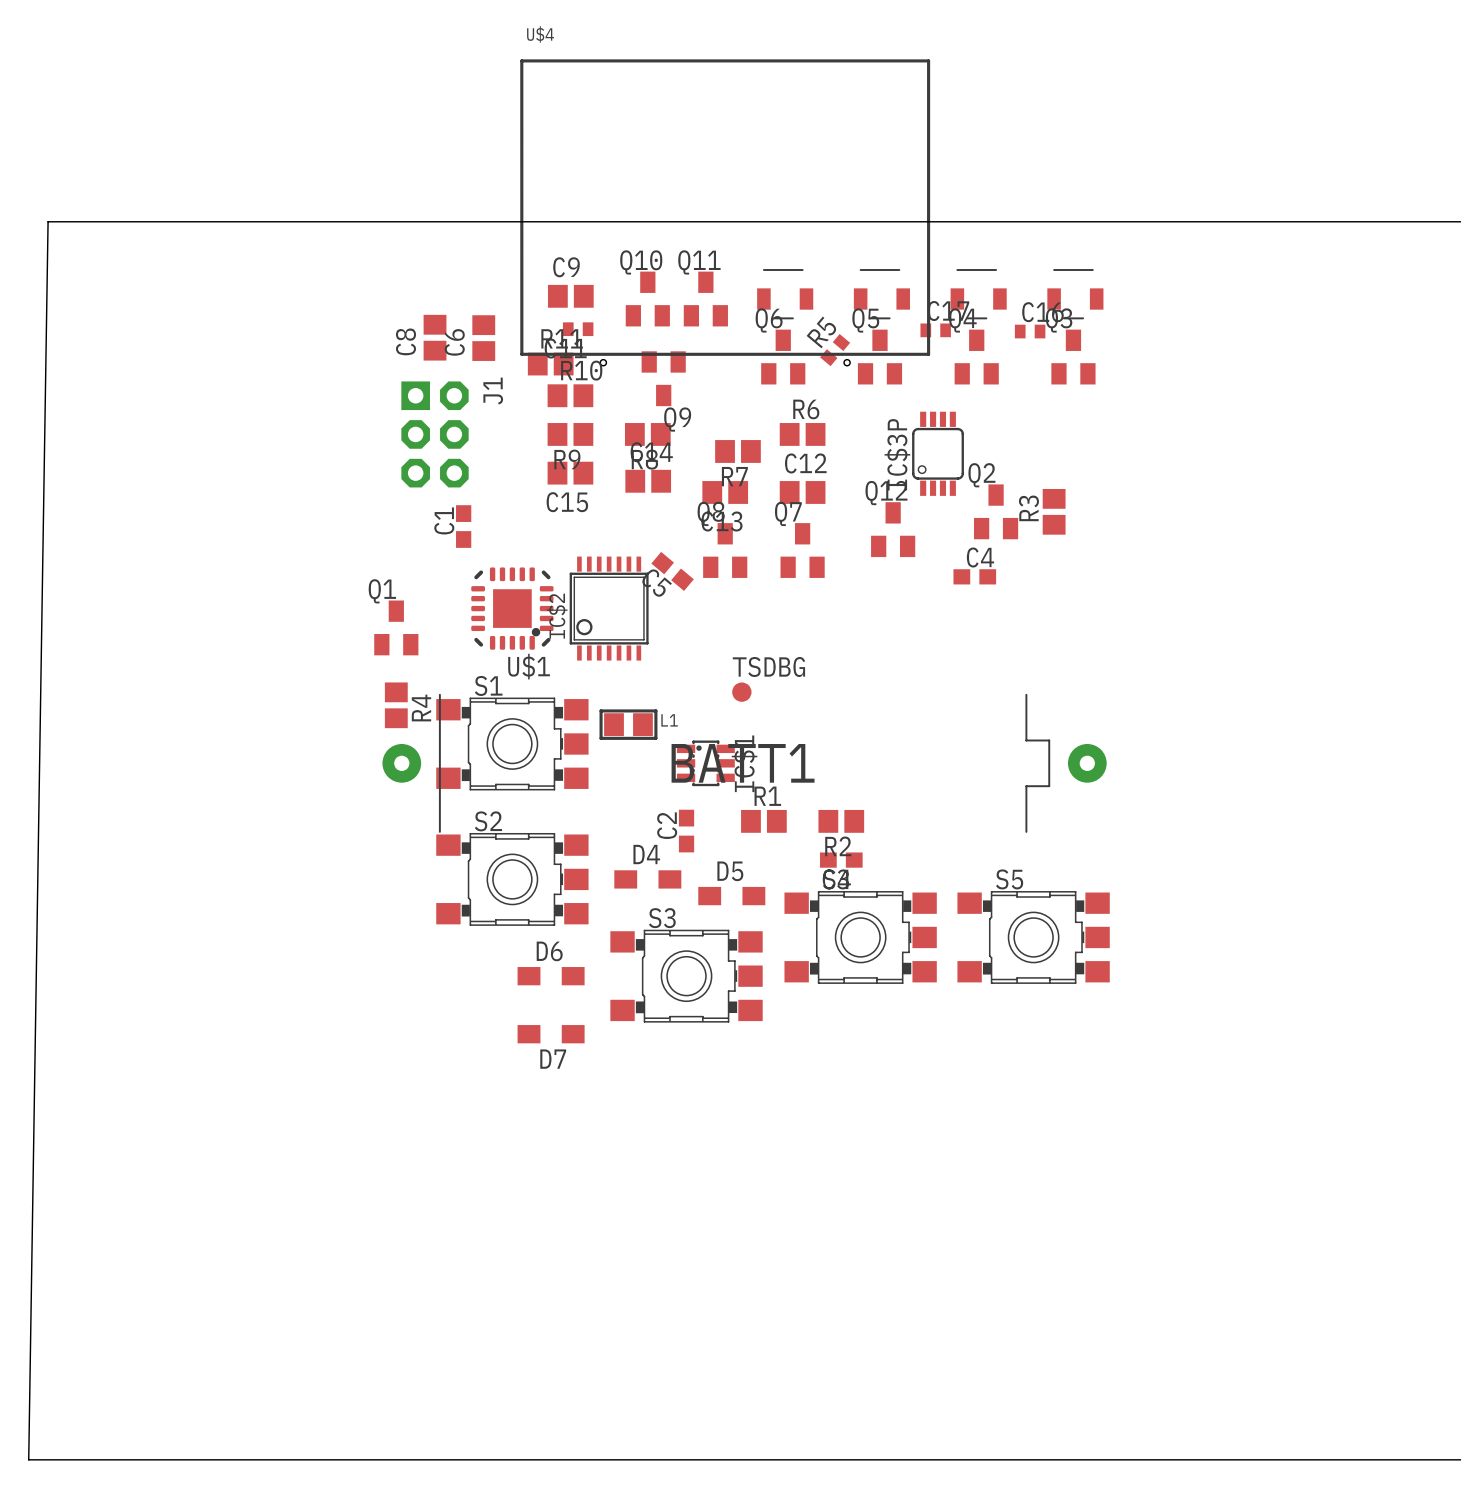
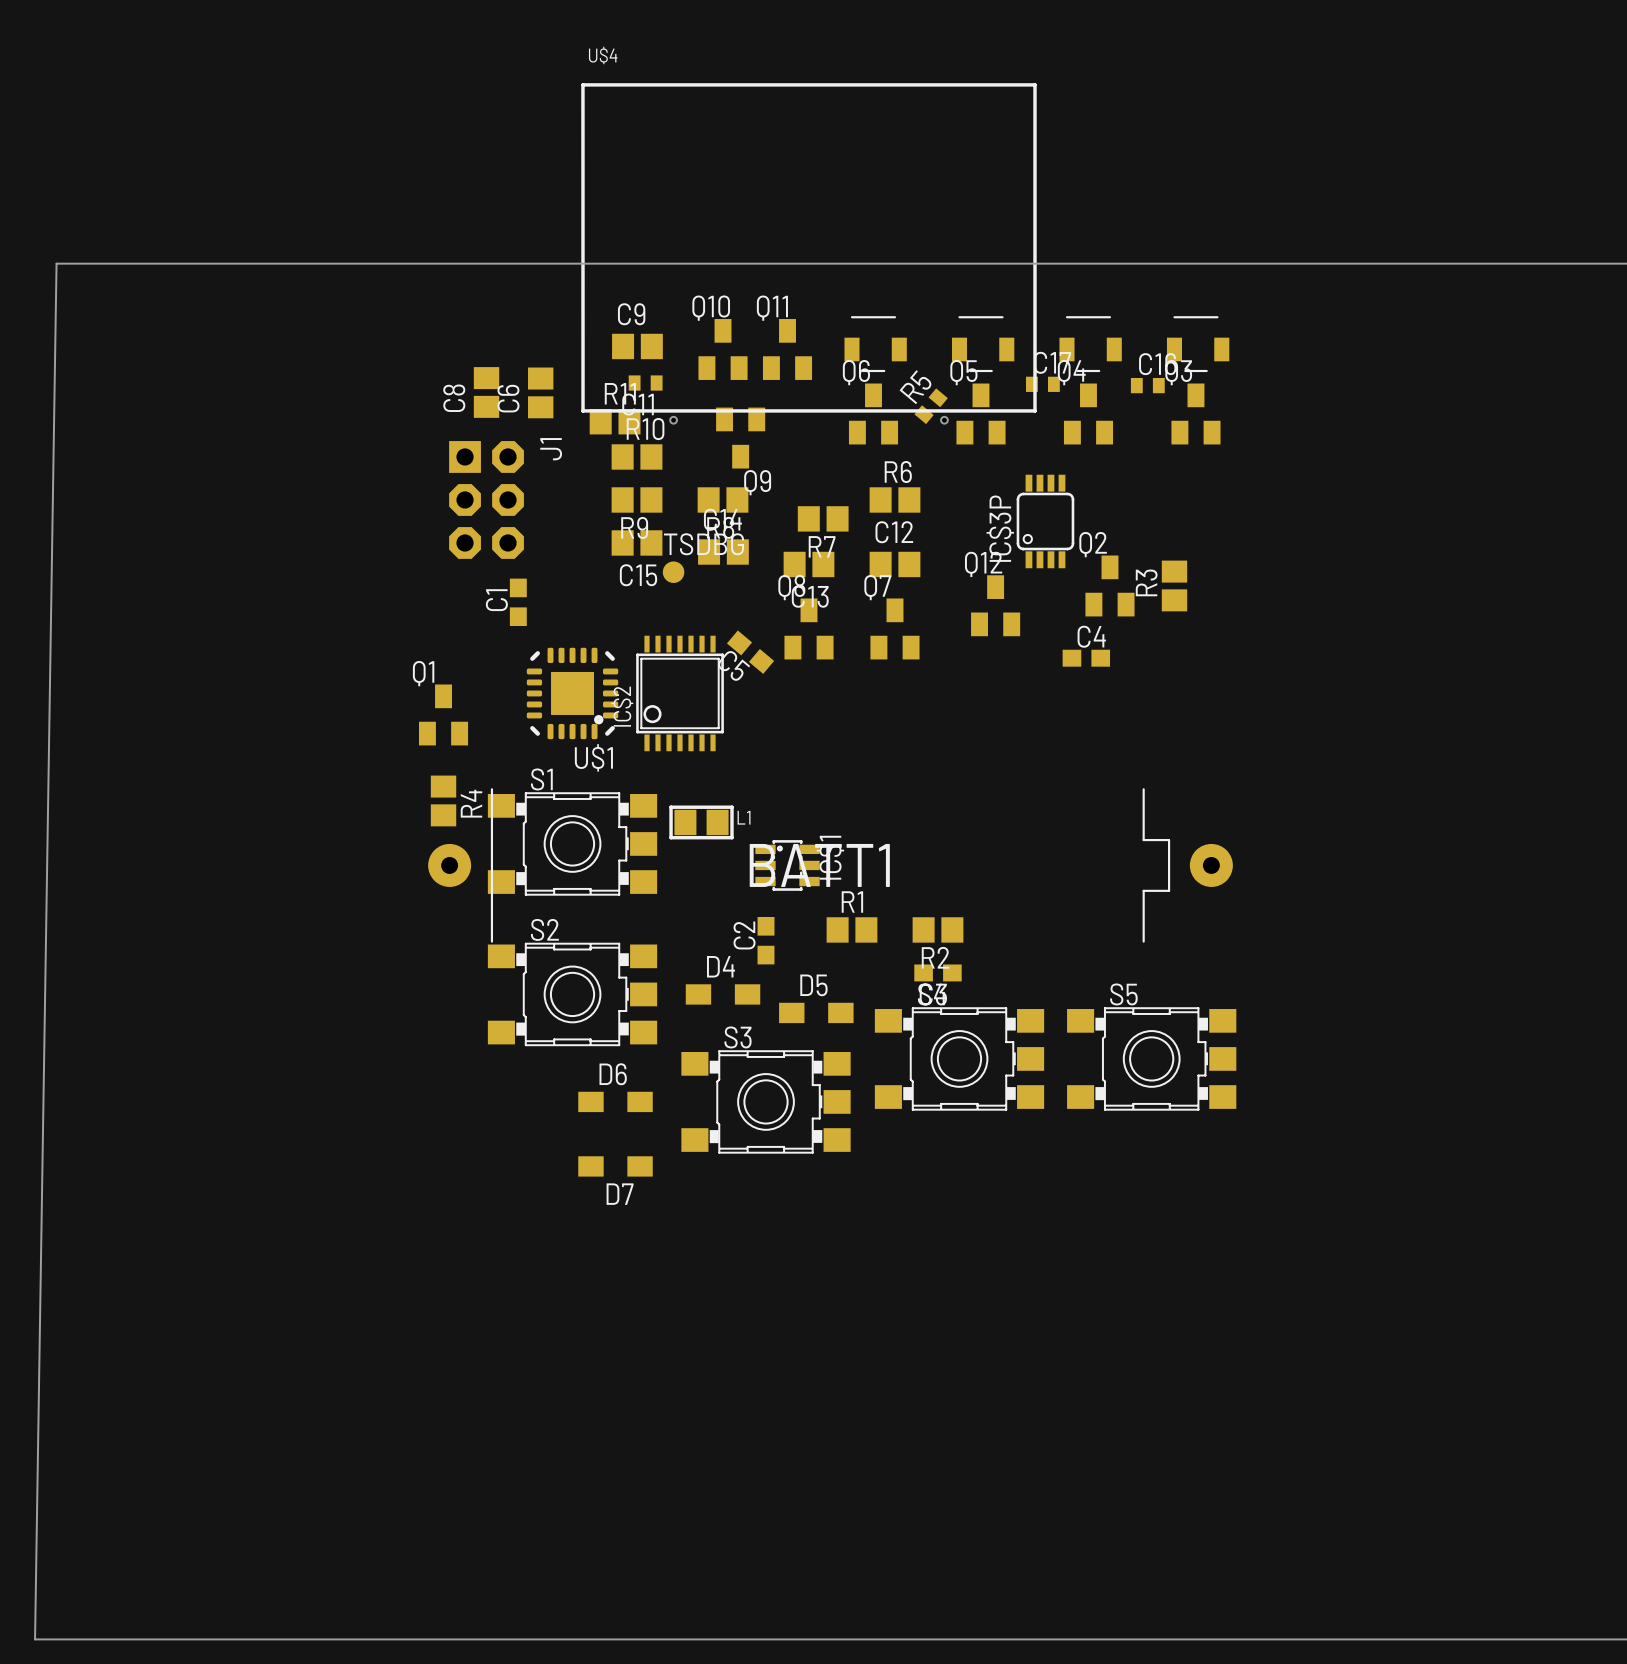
TSDBG position: (741, 692) -> (673, 572)

